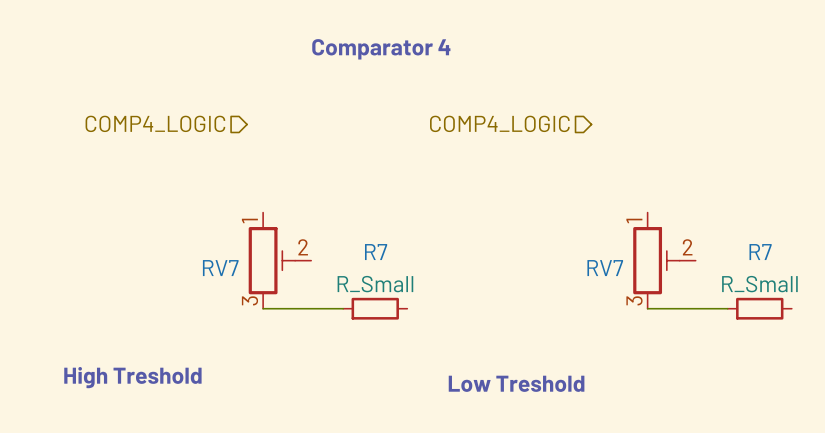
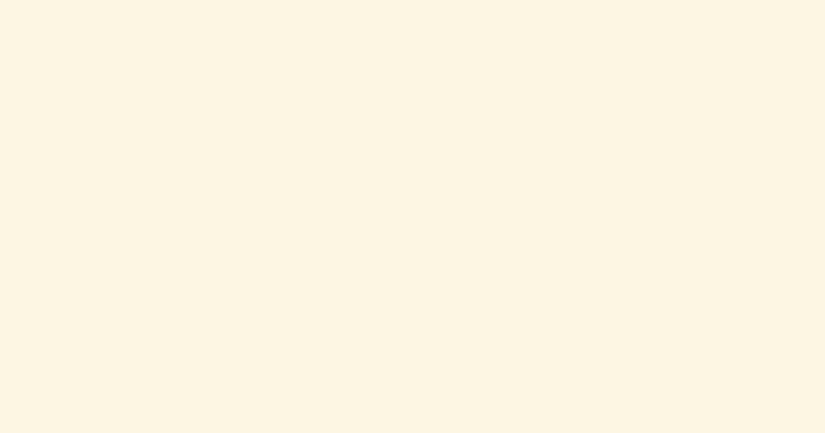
text: Comparator 4 (381, 49) -> none
hierarchical label: COMP4_LOGIC (155, 123) -> none
hierarchical label: COMP4_LOGIC (499, 123) -> none
RV7: (279, 260) -> none
RV7: (664, 260) -> none
wire: (263, 308) (343, 308) -> none
R7: R_Small (375, 308) -> none
wire: (647, 308) (727, 308) -> none
R7: R_Small (759, 308) -> none
text: High Treshold (132, 377) -> none
text: Low Treshold (516, 383) -> none

